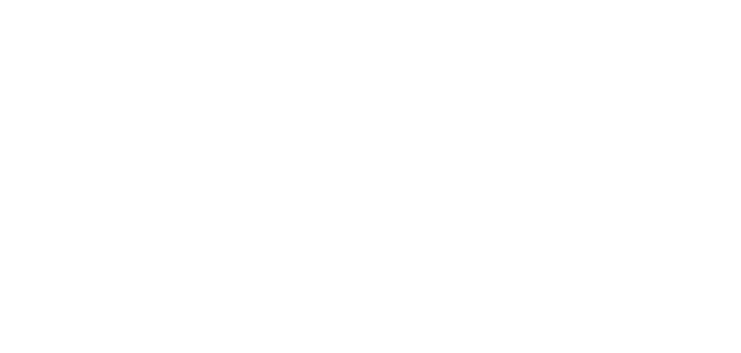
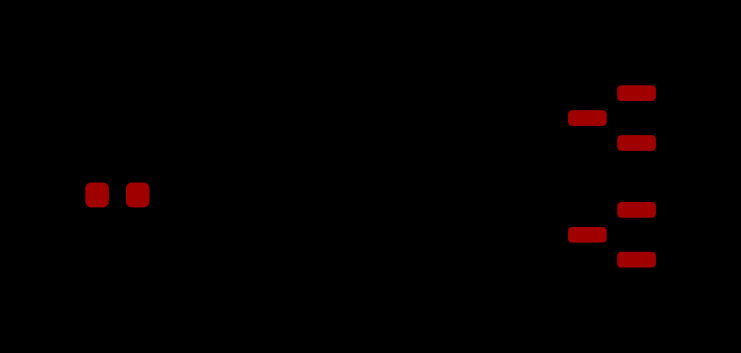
part: none -> (611, 118)
part: none -> (117, 194)
part: none -> (611, 234)

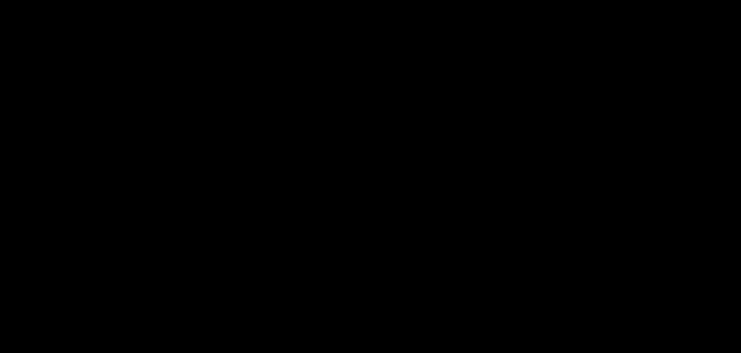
part: (611, 118) -> none
part: (117, 194) -> none
part: (611, 234) -> none

